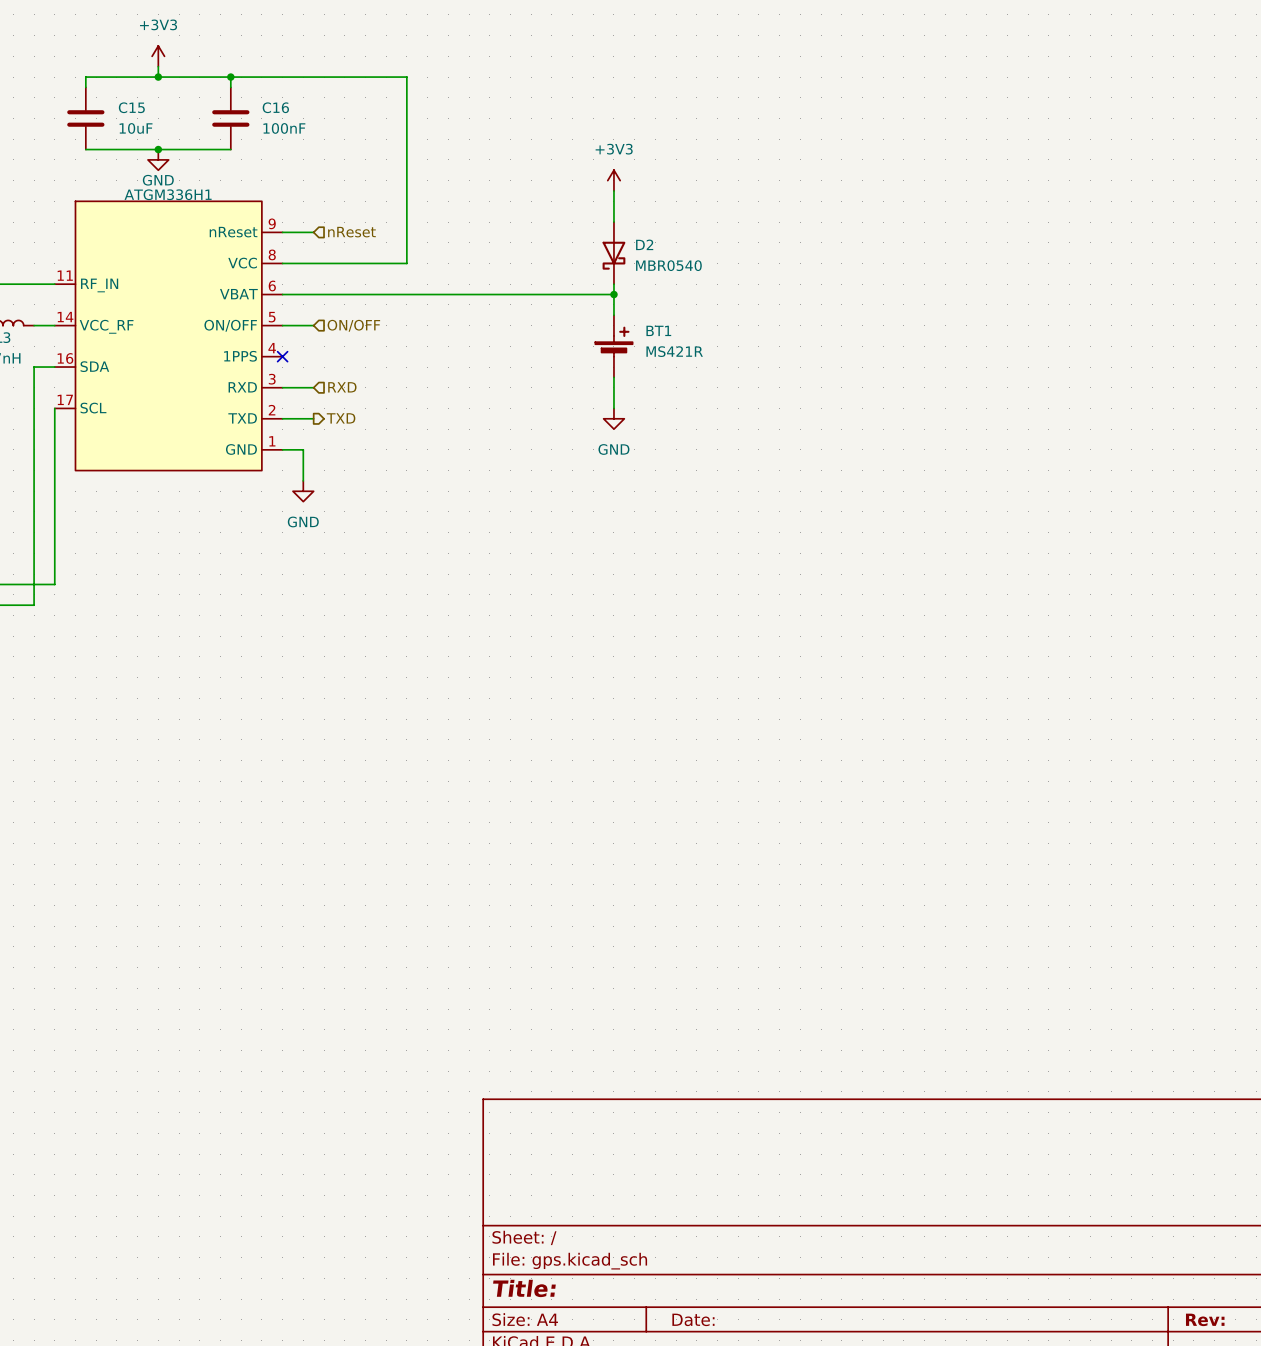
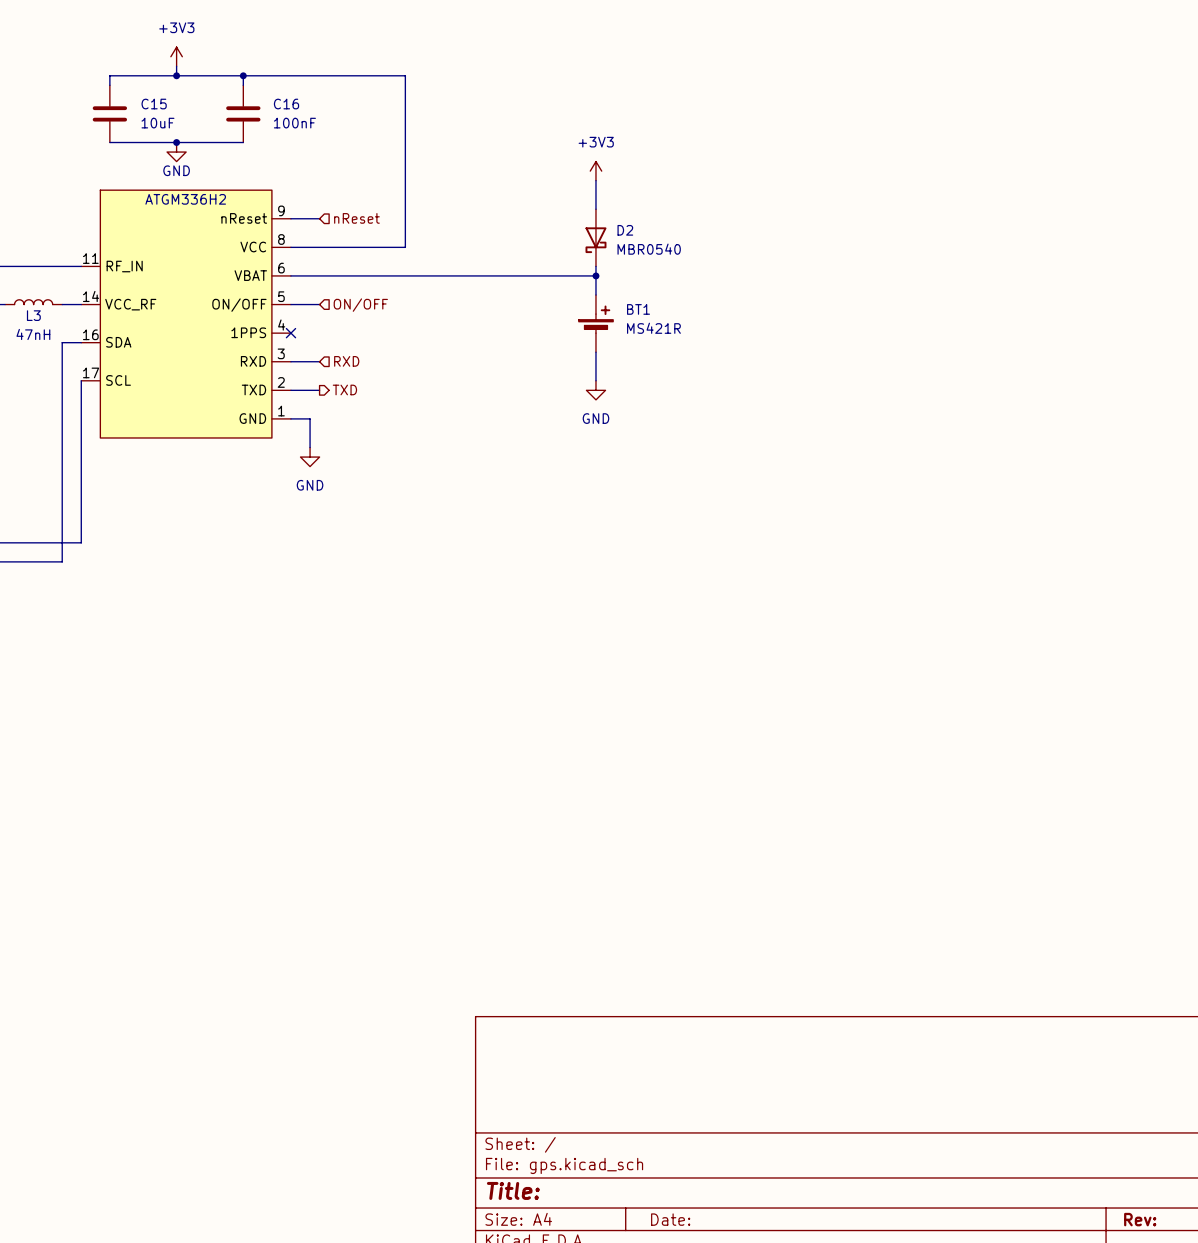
ATGM336H1 name: ATGM336H1 (168, 194) -> ATGM336H2 (185, 199)

